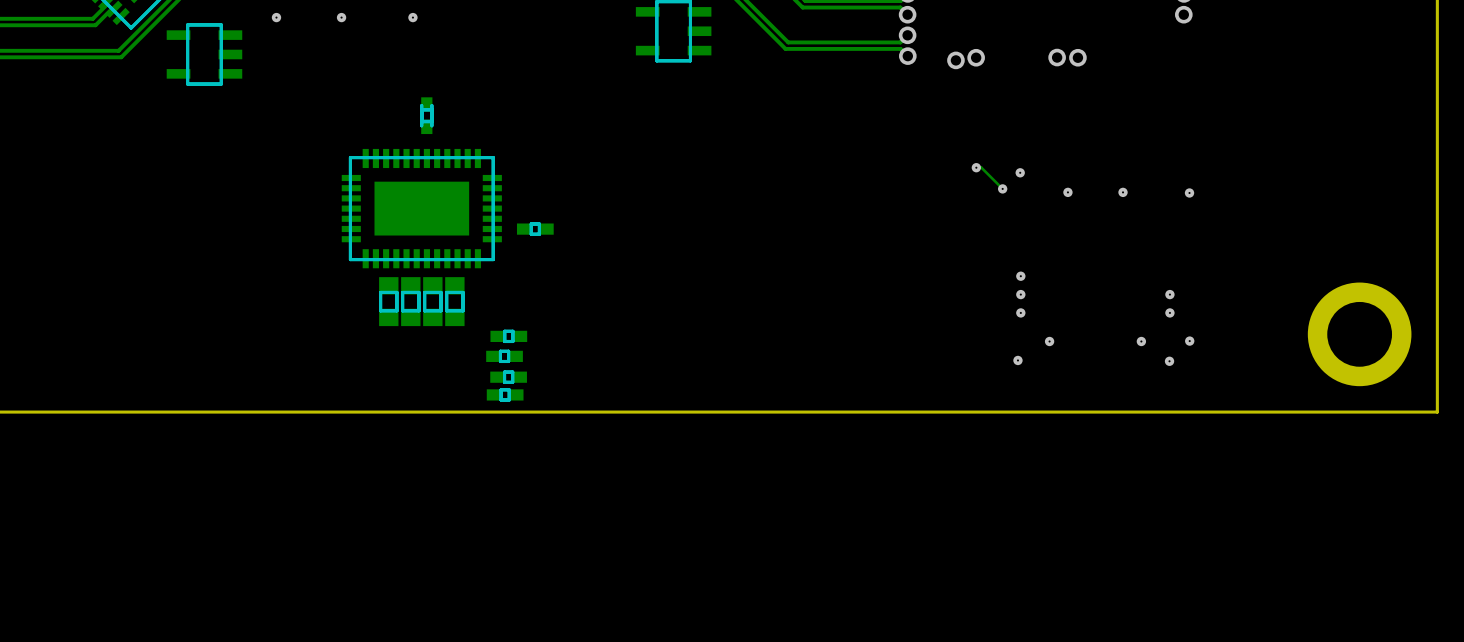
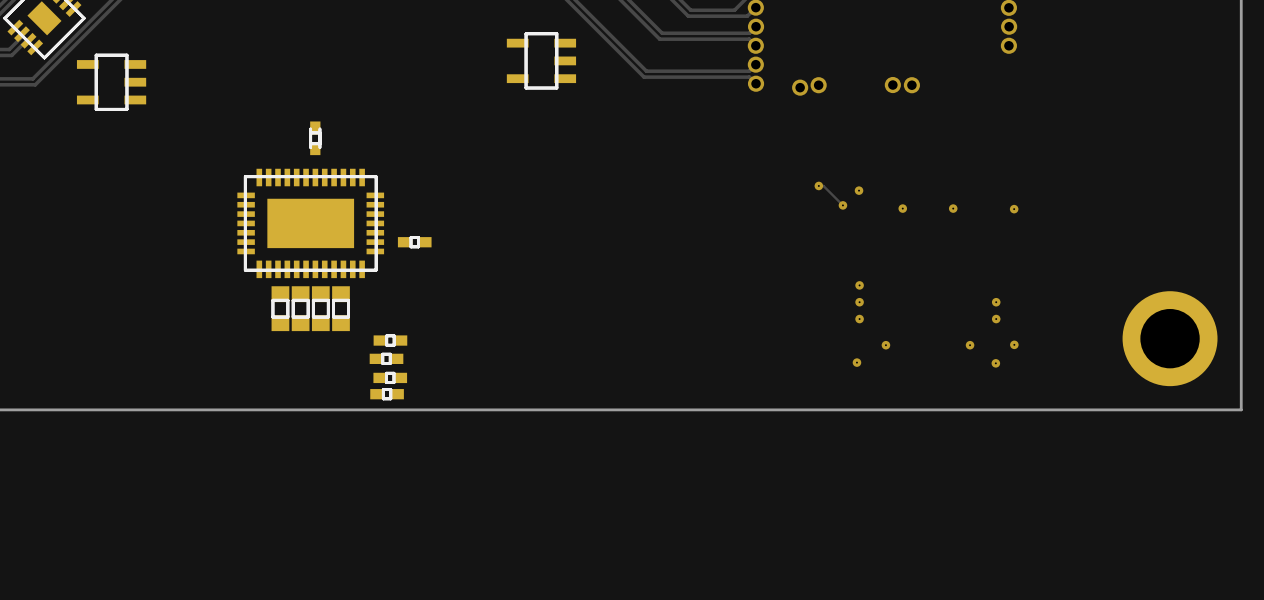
via: (276, 17) -> none
via: (341, 17) -> none
via: (412, 17) -> none

